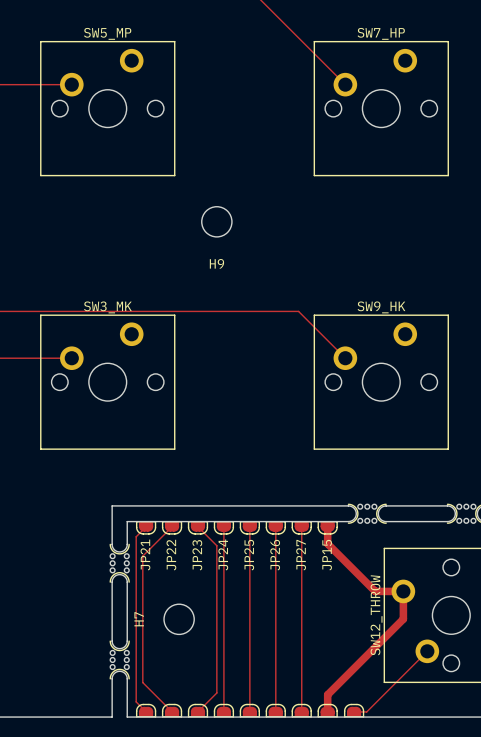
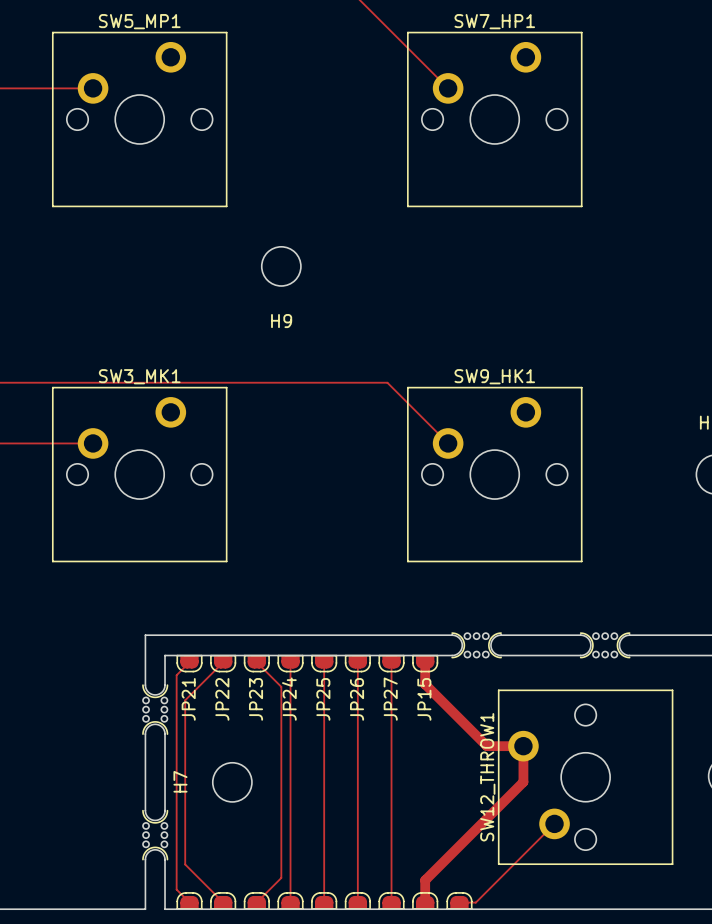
SW5_MP name: SW5_MP (107, 33) -> SW5_MP1 (139, 21)
SW7_HP name: SW7_HP (381, 33) -> SW7_HP1 (494, 21)
SW3_MK name: SW3_MK (107, 307) -> SW3_MK1 (139, 376)
SW9_HK name: SW9_HK (381, 307) -> SW9_HK1 (494, 376)
SW12_THROW name: SW12_THROW (376, 615) -> SW12_THROW1 (487, 777)

